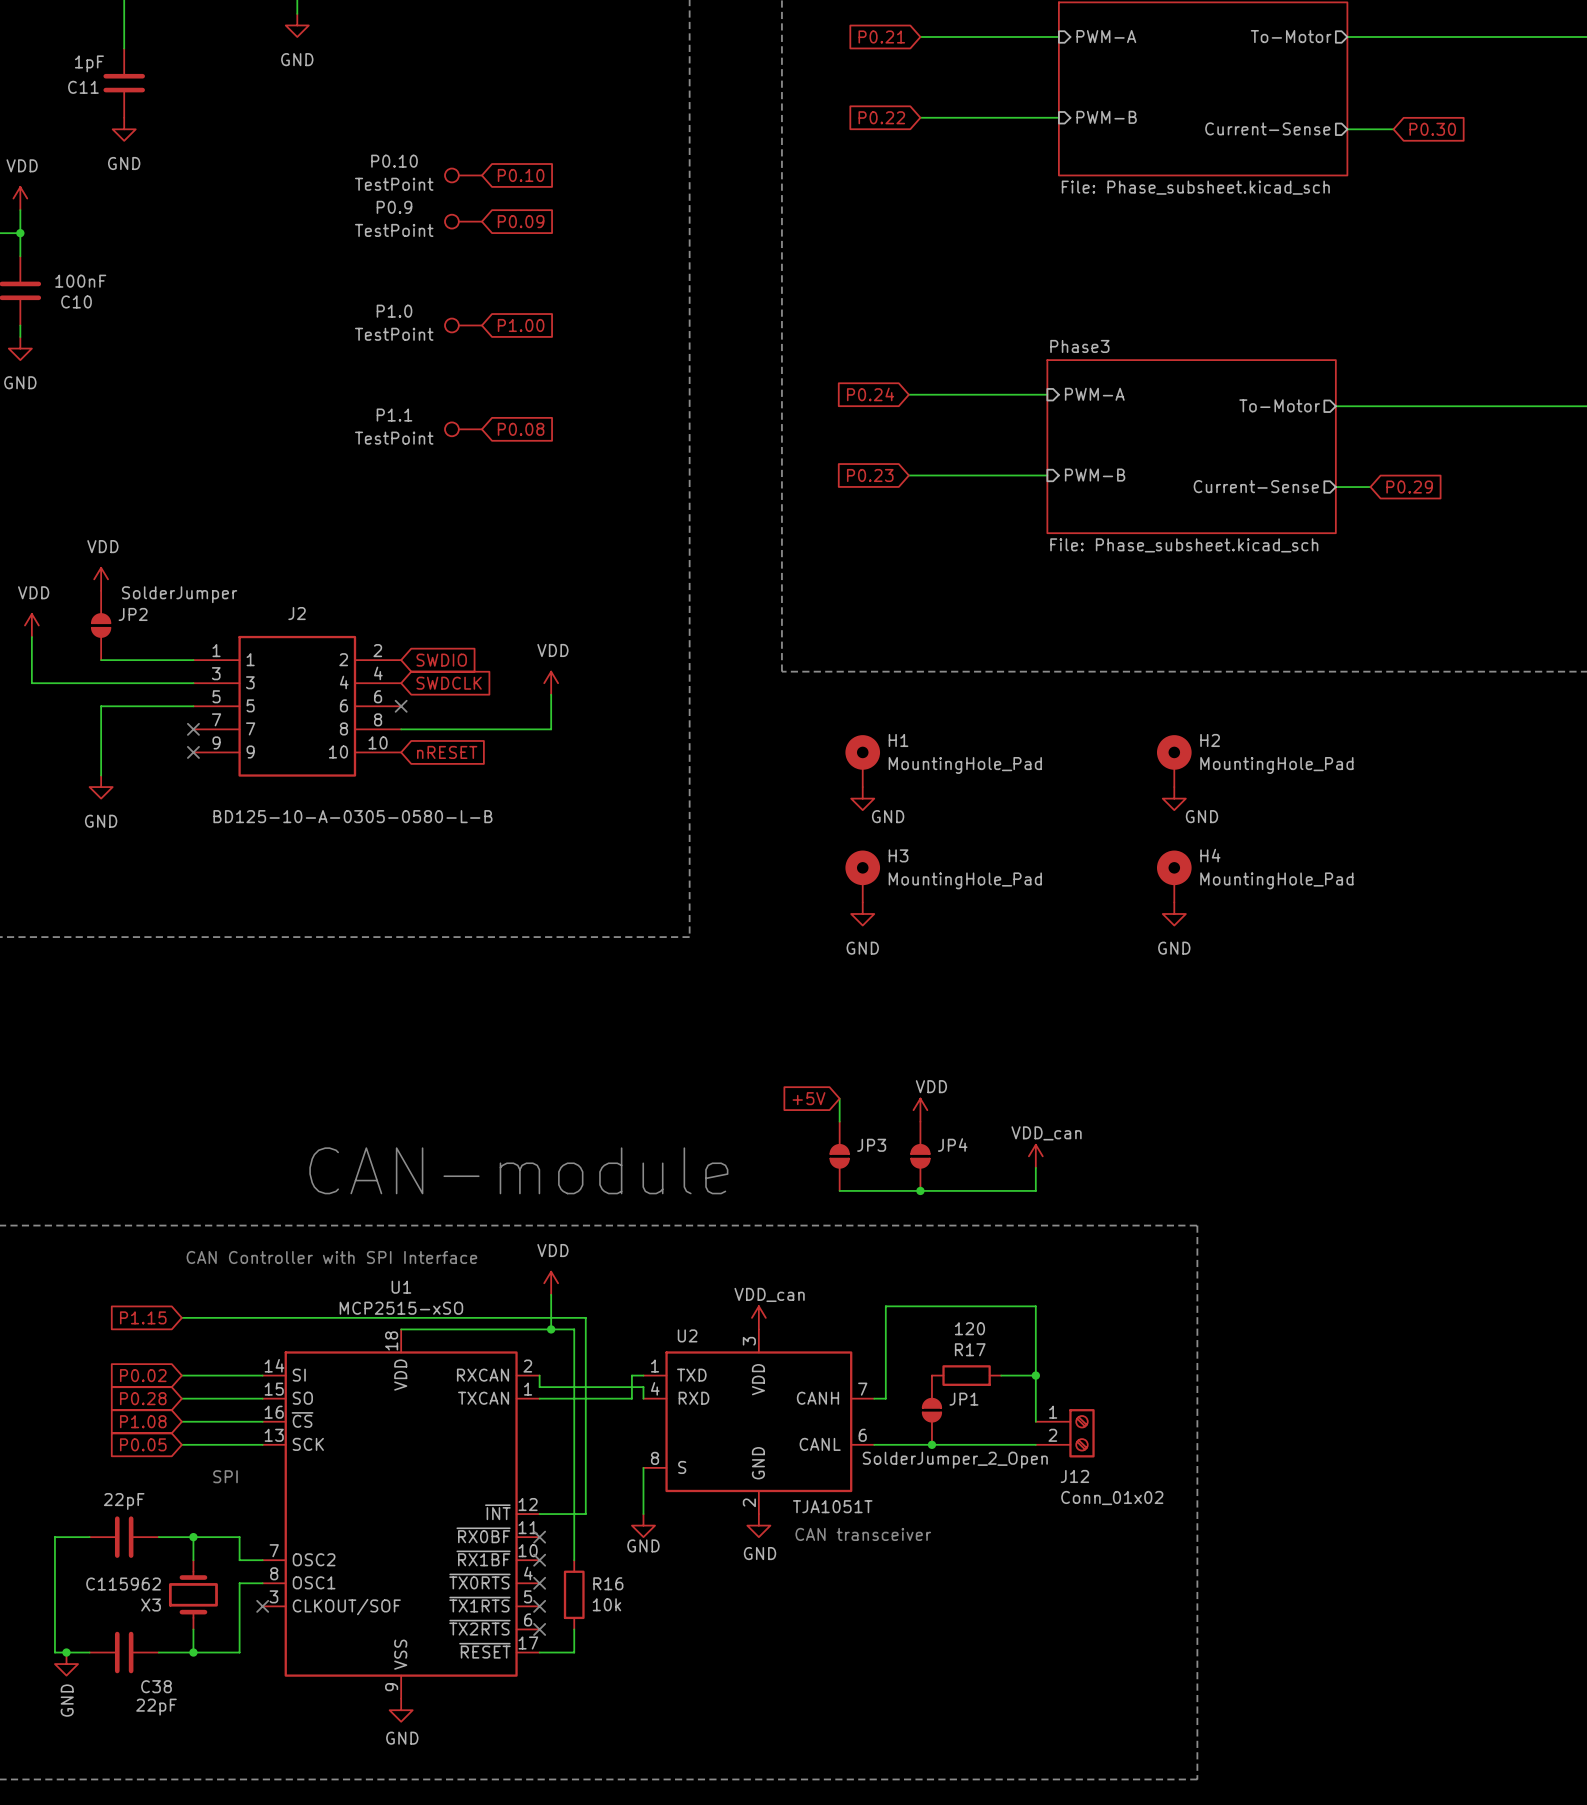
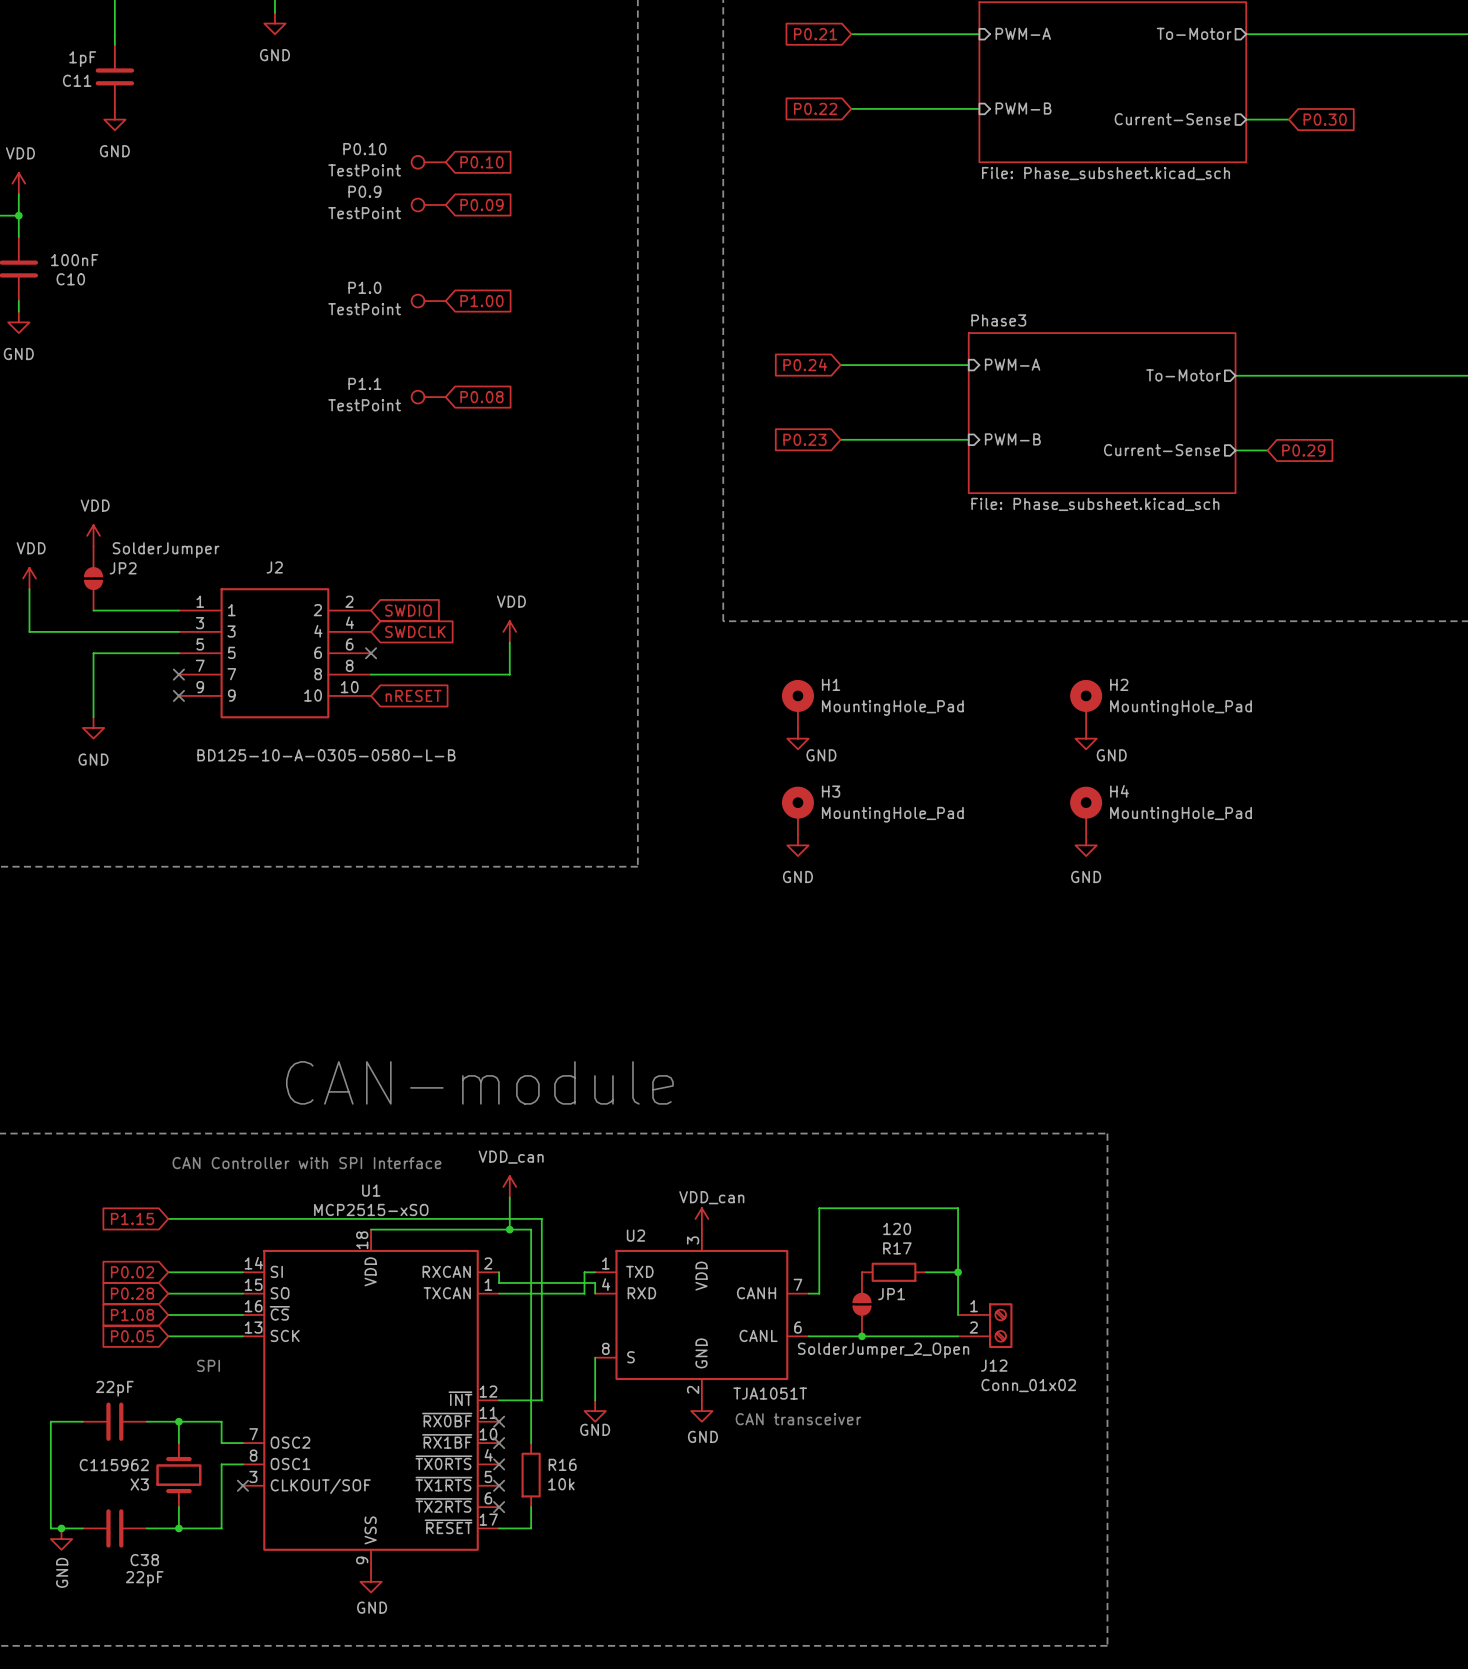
global label: +5V (809, 1098) -> none
wire: (839, 1098) (839, 1121) -> none
power symbol: VDD (920, 1110) -> none
JP3: (839, 1156) -> none
JP4: (920, 1156) -> none
power symbol: VDD_can (1035, 1156) -> none
wire: (1035, 1167) (1035, 1190) (839, 1190) -> none
junction: (920, 1190) -> none
power symbol: VDD (551, 1283) -> VDD_can (509, 1186)

